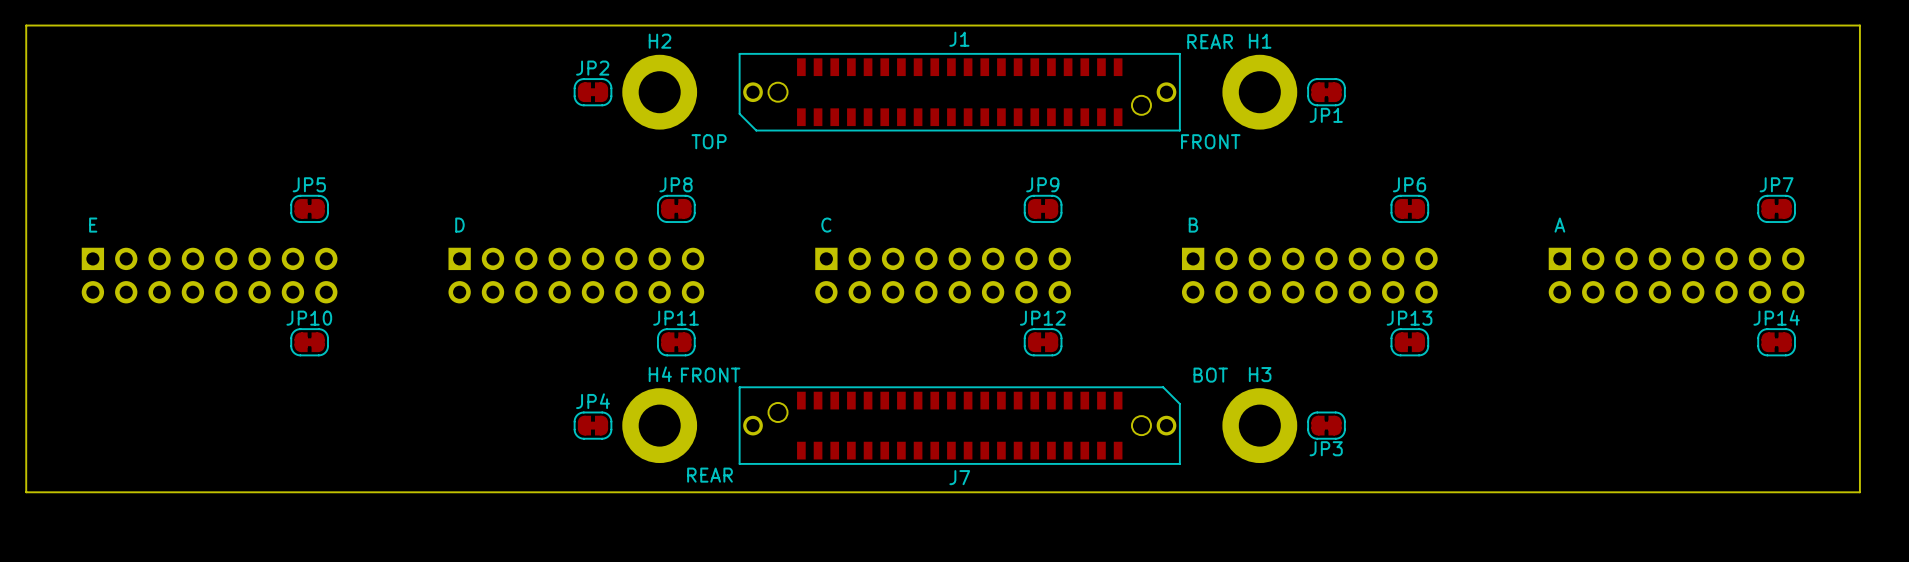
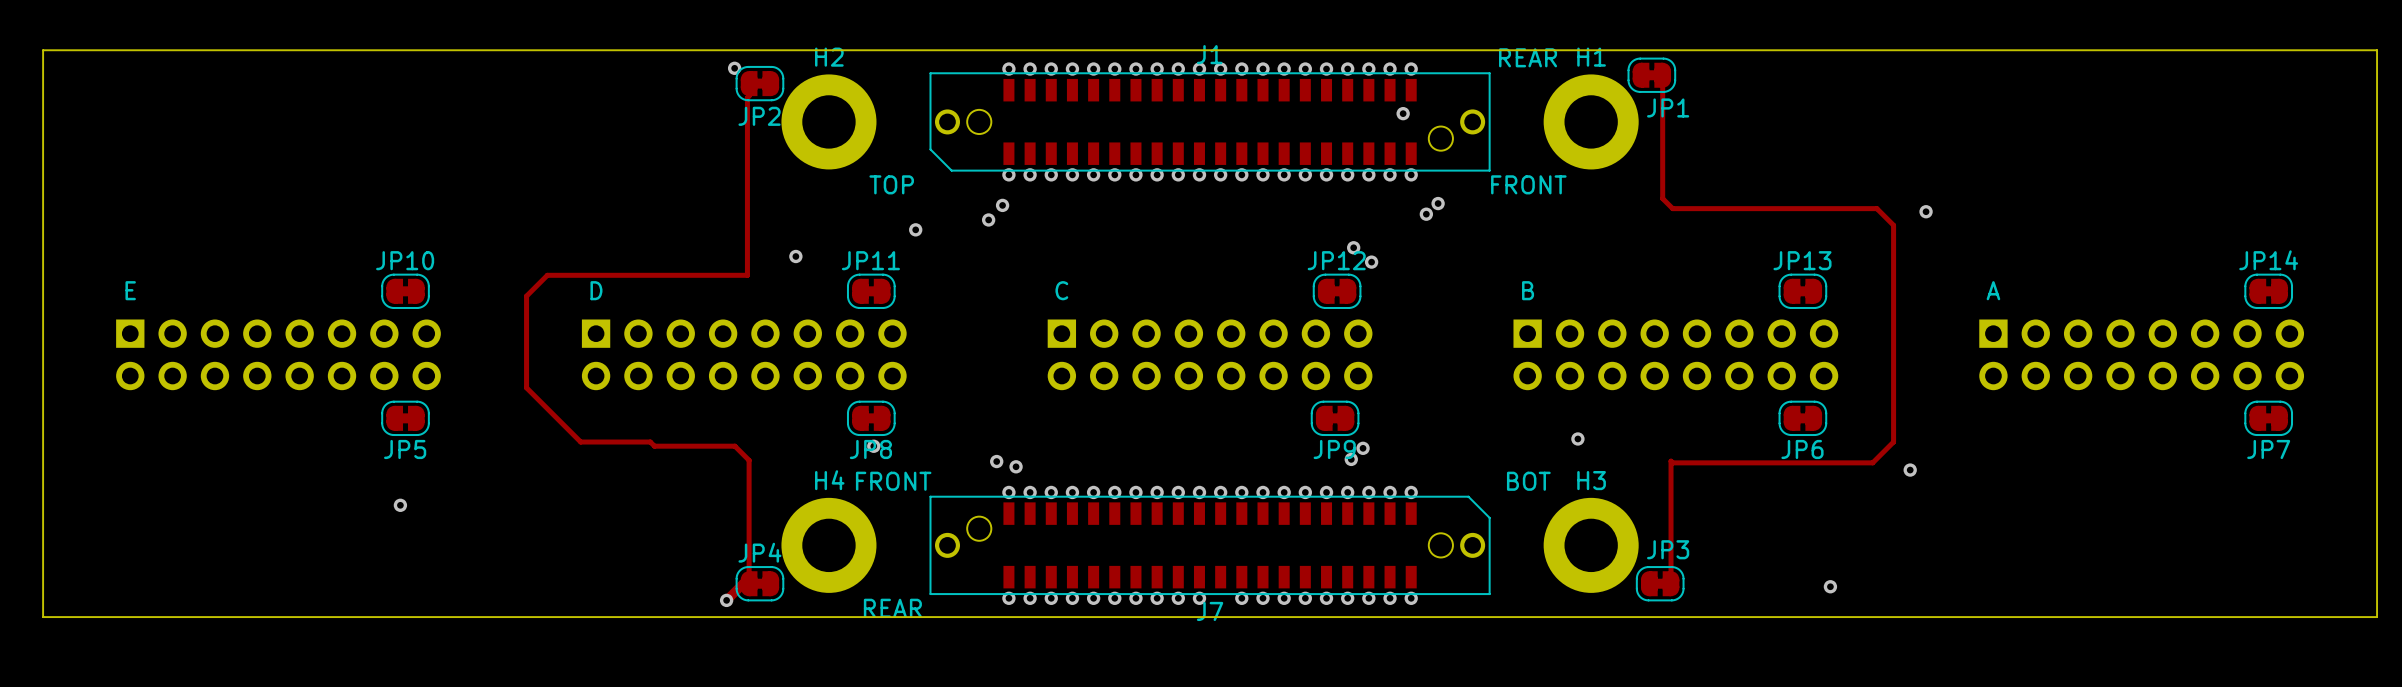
board edge: (26, 25) (1859, 25) (1859, 492) (26, 492) (26, 25) -> (43, 50) (43, 617) (2377, 617) (2377, 50) (43, 50)
via: none -> (734, 68)
via: none -> (1008, 69)
via: none -> (1030, 69)
via: none -> (1051, 69)
via: none -> (1072, 69)
via: none -> (1093, 69)
via: none -> (1114, 69)
via: none -> (1135, 69)
via: none -> (1157, 69)
via: none -> (1178, 69)
via: none -> (1199, 69)
via: none -> (1220, 69)
via: none -> (1241, 69)
via: none -> (1263, 69)
via: none -> (1284, 69)
via: none -> (1305, 69)
via: none -> (1326, 69)
via: none -> (1347, 69)
via: none -> (1368, 69)
via: none -> (1390, 69)
via: none -> (1411, 69)
top track: none -> (1662, 75) (1662, 198) (1672, 208) (1876, 208) (1893, 225) (1893, 442) (1872, 462) (1672, 462) (1671, 461) (1671, 583)
top track: none -> (749, 83) (747, 97) (747, 275) (547, 275) (526, 296) (526, 387) (580, 442) (650, 442) (654, 446) (734, 446) (749, 460) (749, 583) (743, 583) (726, 600)
JP2 name position: JP2 (592, 68) -> JP2 (759, 116)
via: none -> (1403, 113)
JP2 position: (593, 92) -> (759, 83)
JP1 position: (1326, 92) -> (1651, 75)
JP1 name position: JP1 (1326, 115) -> JP1 (1668, 107)
via: none -> (1008, 174)
via: none -> (1030, 174)
via: none -> (1051, 174)
via: none -> (1072, 174)
via: none -> (1093, 174)
via: none -> (1114, 174)
via: none -> (1135, 174)
via: none -> (1157, 174)
via: none -> (1178, 174)
via: none -> (1199, 174)
via: none -> (1220, 174)
via: none -> (1241, 174)
via: none -> (1263, 174)
via: none -> (1284, 174)
via: none -> (1305, 174)
via: none -> (1326, 174)
via: none -> (1347, 174)
via: none -> (1368, 174)
via: none -> (1390, 174)
via: none -> (1411, 174)
via: none -> (1438, 203)
via: none -> (1002, 205)
via: none -> (1926, 211)
via: none -> (1426, 214)
via: none -> (988, 219)
via: none -> (915, 229)
JP5 name position: JP5 (309, 184) -> JP5 (405, 449)
JP8 name position: JP8 (676, 184) -> JP8 (870, 449)
JP9 name position: JP9 (1042, 184) -> JP9 (1334, 449)
JP6 name position: JP6 (1409, 184) -> JP6 (1802, 449)
JP7 name position: JP7 (1776, 184) -> JP7 (2268, 449)
via: none -> (1353, 247)
via: none -> (795, 256)
via: none -> (1371, 262)
JP5 position: (309, 208) -> (405, 418)
JP8 position: (676, 208) -> (871, 418)
JP9 position: (1043, 208) -> (1335, 418)
JP6 position: (1409, 208) -> (1802, 418)
JP7 position: (1776, 208) -> (2268, 418)
text position: E (93, 225) -> E (130, 290)
text position: D (459, 225) -> D (596, 290)
text position: C (826, 225) -> C (1061, 290)
text position: B (1193, 225) -> B (1528, 290)
text position: A (1559, 225) -> A (1993, 290)
part position: (209, 275) -> (278, 354)
part position: (576, 275) -> (744, 354)
part position: (943, 275) -> (1210, 354)
part position: (1309, 275) -> (1675, 354)
part position: (1676, 275) -> (2141, 354)
via: none -> (1577, 438)
JP10 position: (309, 342) -> (405, 291)
JP11 position: (676, 342) -> (871, 291)
JP12 position: (1043, 342) -> (1337, 291)
JP13 position: (1409, 342) -> (1802, 291)
JP14 position: (1776, 342) -> (2268, 291)
via: none -> (873, 446)
via: none -> (1363, 448)
via: none -> (1351, 459)
via: none -> (996, 461)
via: none -> (1016, 466)
via: none -> (1910, 470)
via: none -> (1008, 492)
via: none -> (1030, 492)
via: none -> (1051, 492)
via: none -> (1072, 492)
via: none -> (1093, 492)
via: none -> (1114, 492)
via: none -> (1135, 492)
via: none -> (1157, 492)
via: none -> (1178, 492)
via: none -> (1199, 492)
via: none -> (1220, 492)
via: none -> (1241, 492)
via: none -> (1263, 492)
via: none -> (1284, 492)
via: none -> (1305, 492)
via: none -> (1326, 492)
via: none -> (1347, 492)
via: none -> (1368, 492)
via: none -> (1390, 492)
via: none -> (1411, 492)
via: none -> (400, 505)
JP4 position: (593, 425) -> (759, 583)
JP3 position: (1326, 425) -> (1660, 583)
JP3 name position: JP3 (1326, 448) -> JP3 (1668, 549)
via: none -> (1830, 586)
via: none -> (1008, 598)
via: none -> (1030, 598)
via: none -> (1051, 598)
via: none -> (1072, 598)
via: none -> (1093, 598)
via: none -> (1114, 598)
via: none -> (1135, 598)
via: none -> (1157, 598)
via: none -> (1178, 598)
via: none -> (1199, 598)
via: none -> (1241, 598)
via: none -> (1263, 598)
via: none -> (1284, 598)
via: none -> (1305, 598)
via: none -> (1326, 598)
via: none -> (1347, 598)
via: none -> (1368, 598)
via: none -> (1390, 598)
via: none -> (1411, 598)
via: none -> (726, 600)

